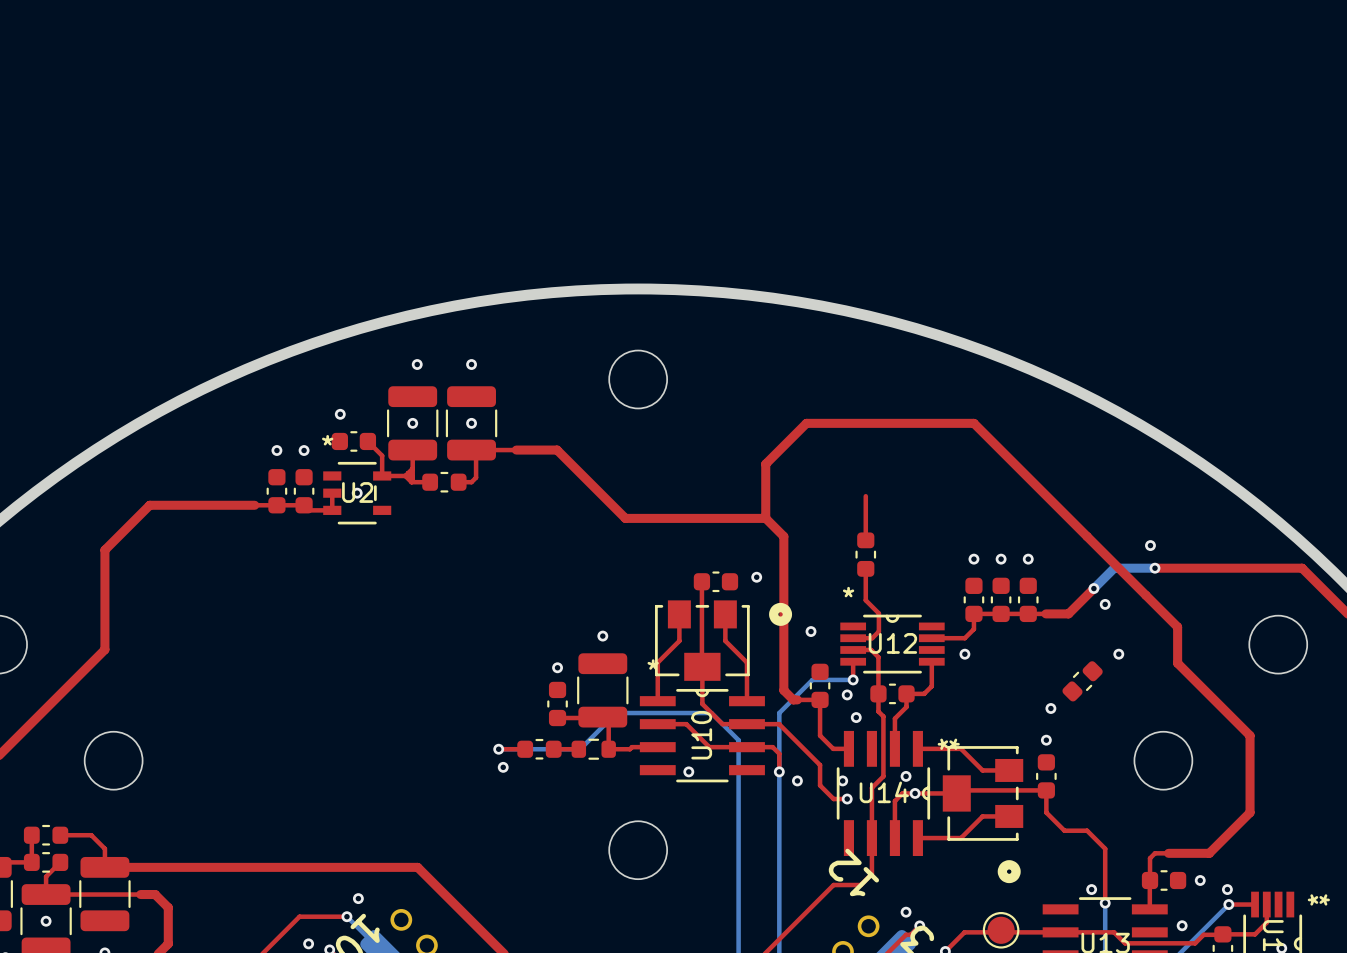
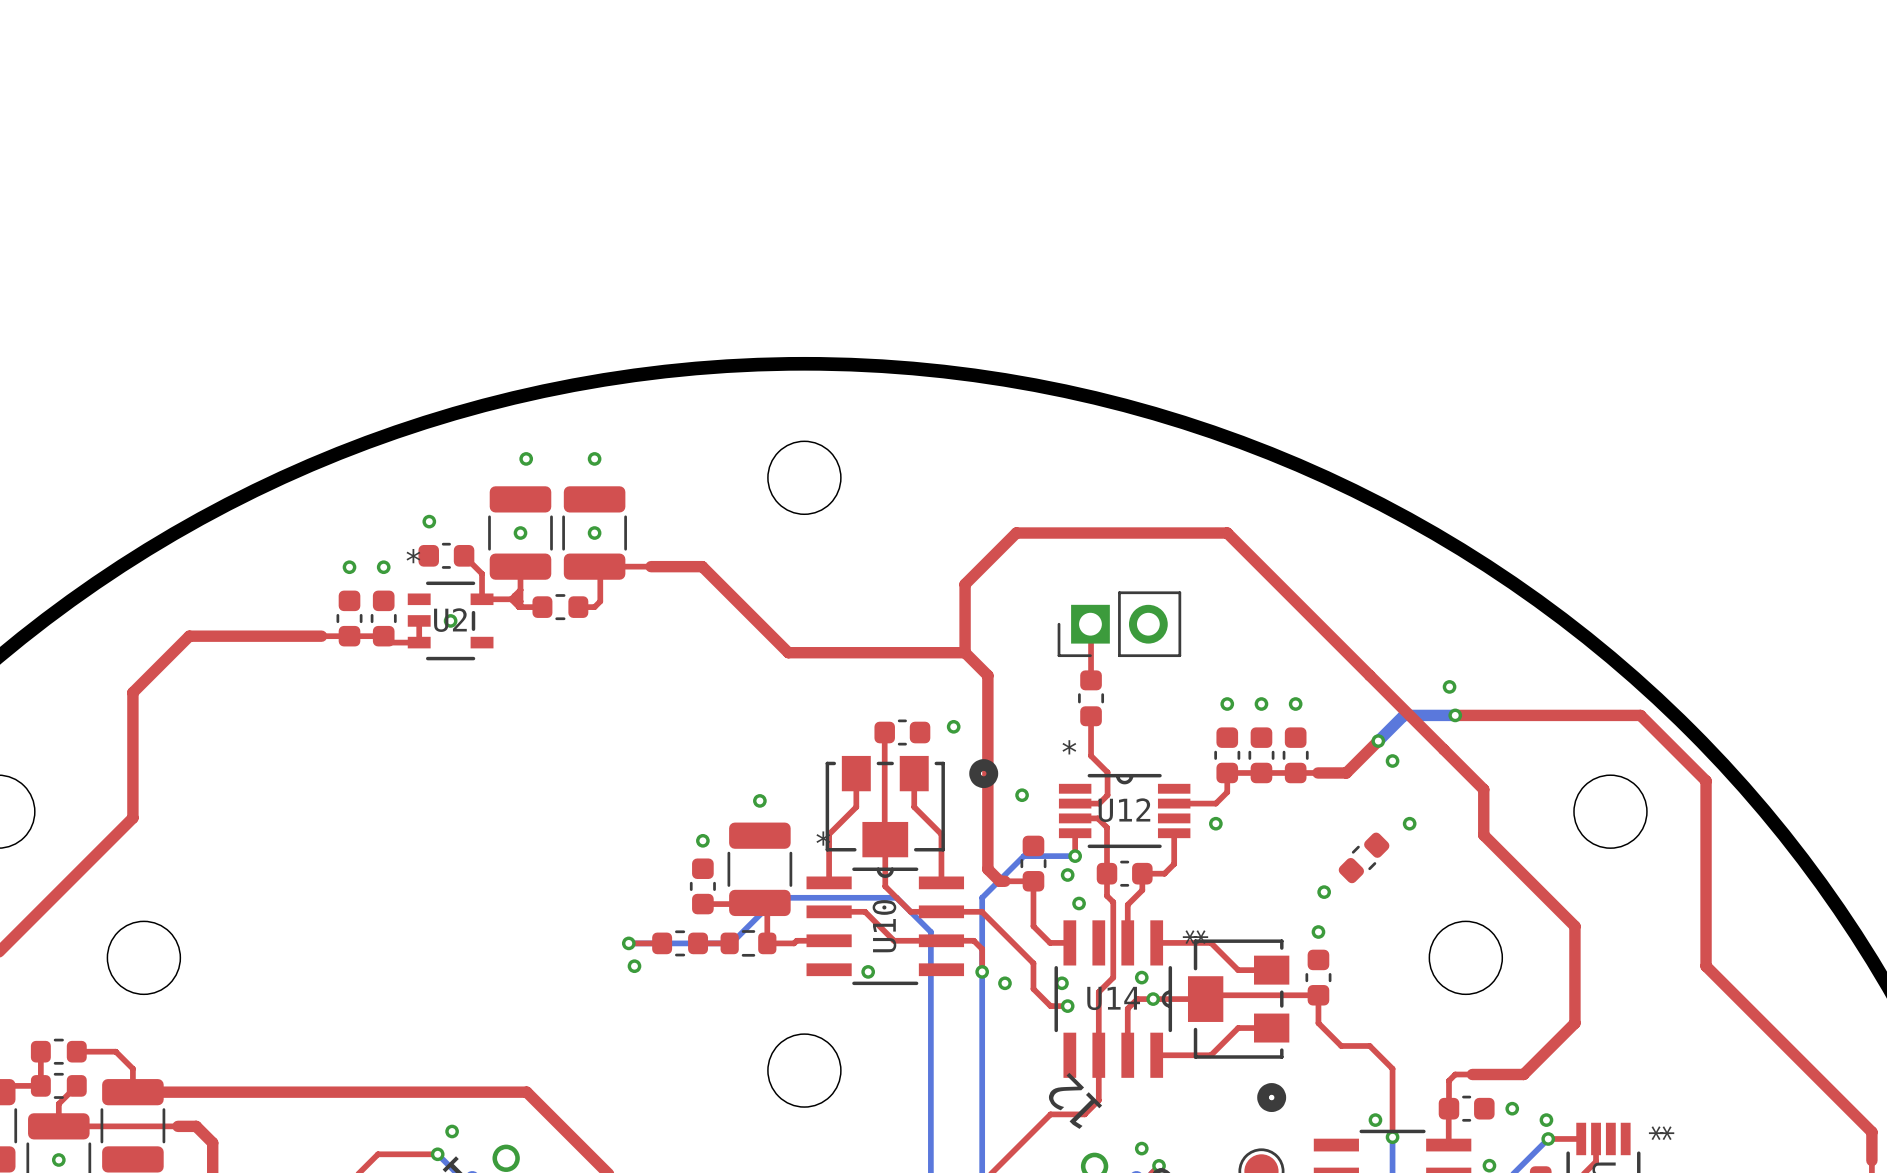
part: none -> (1119, 624)

